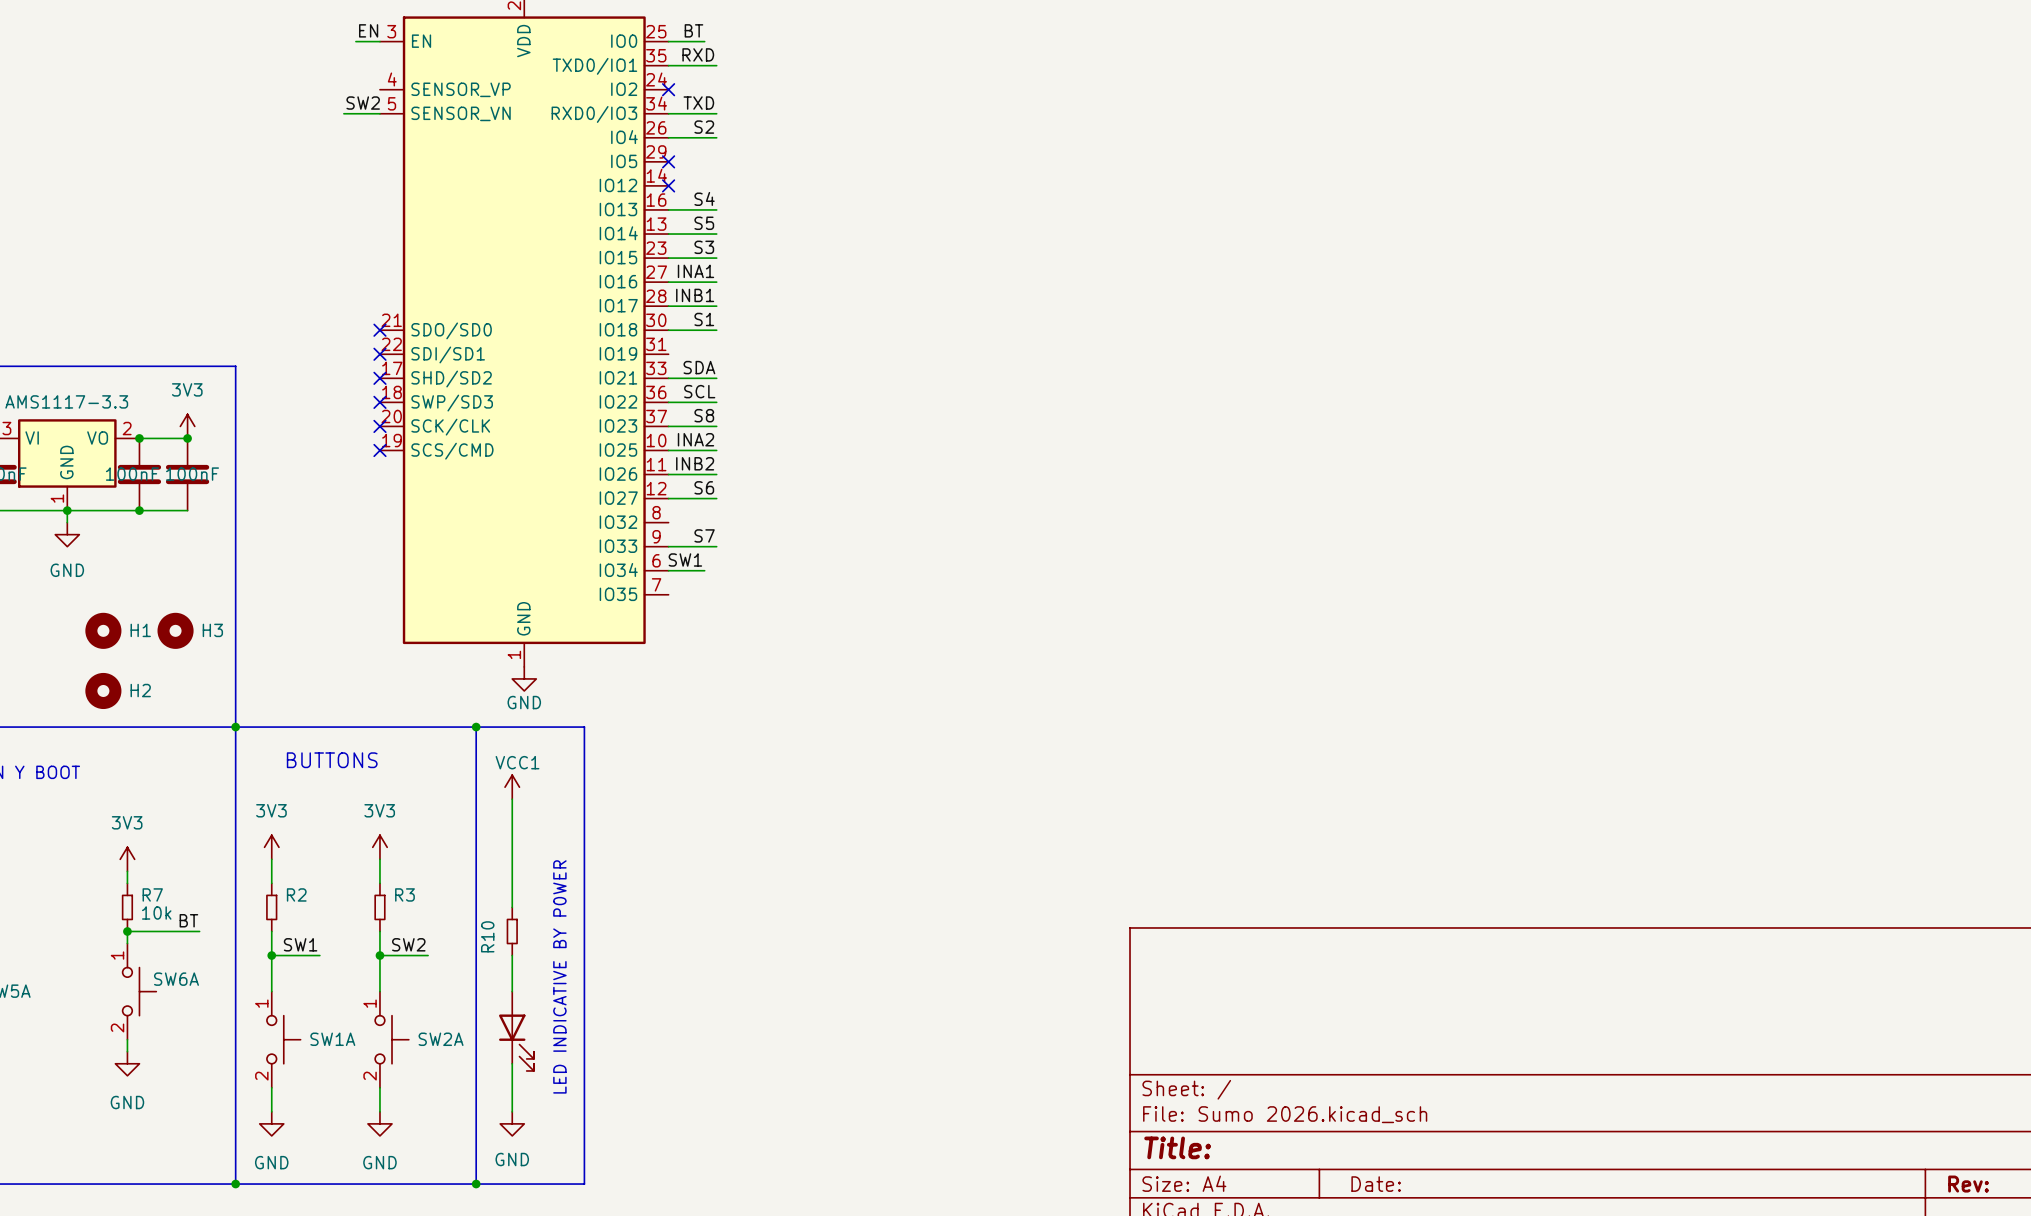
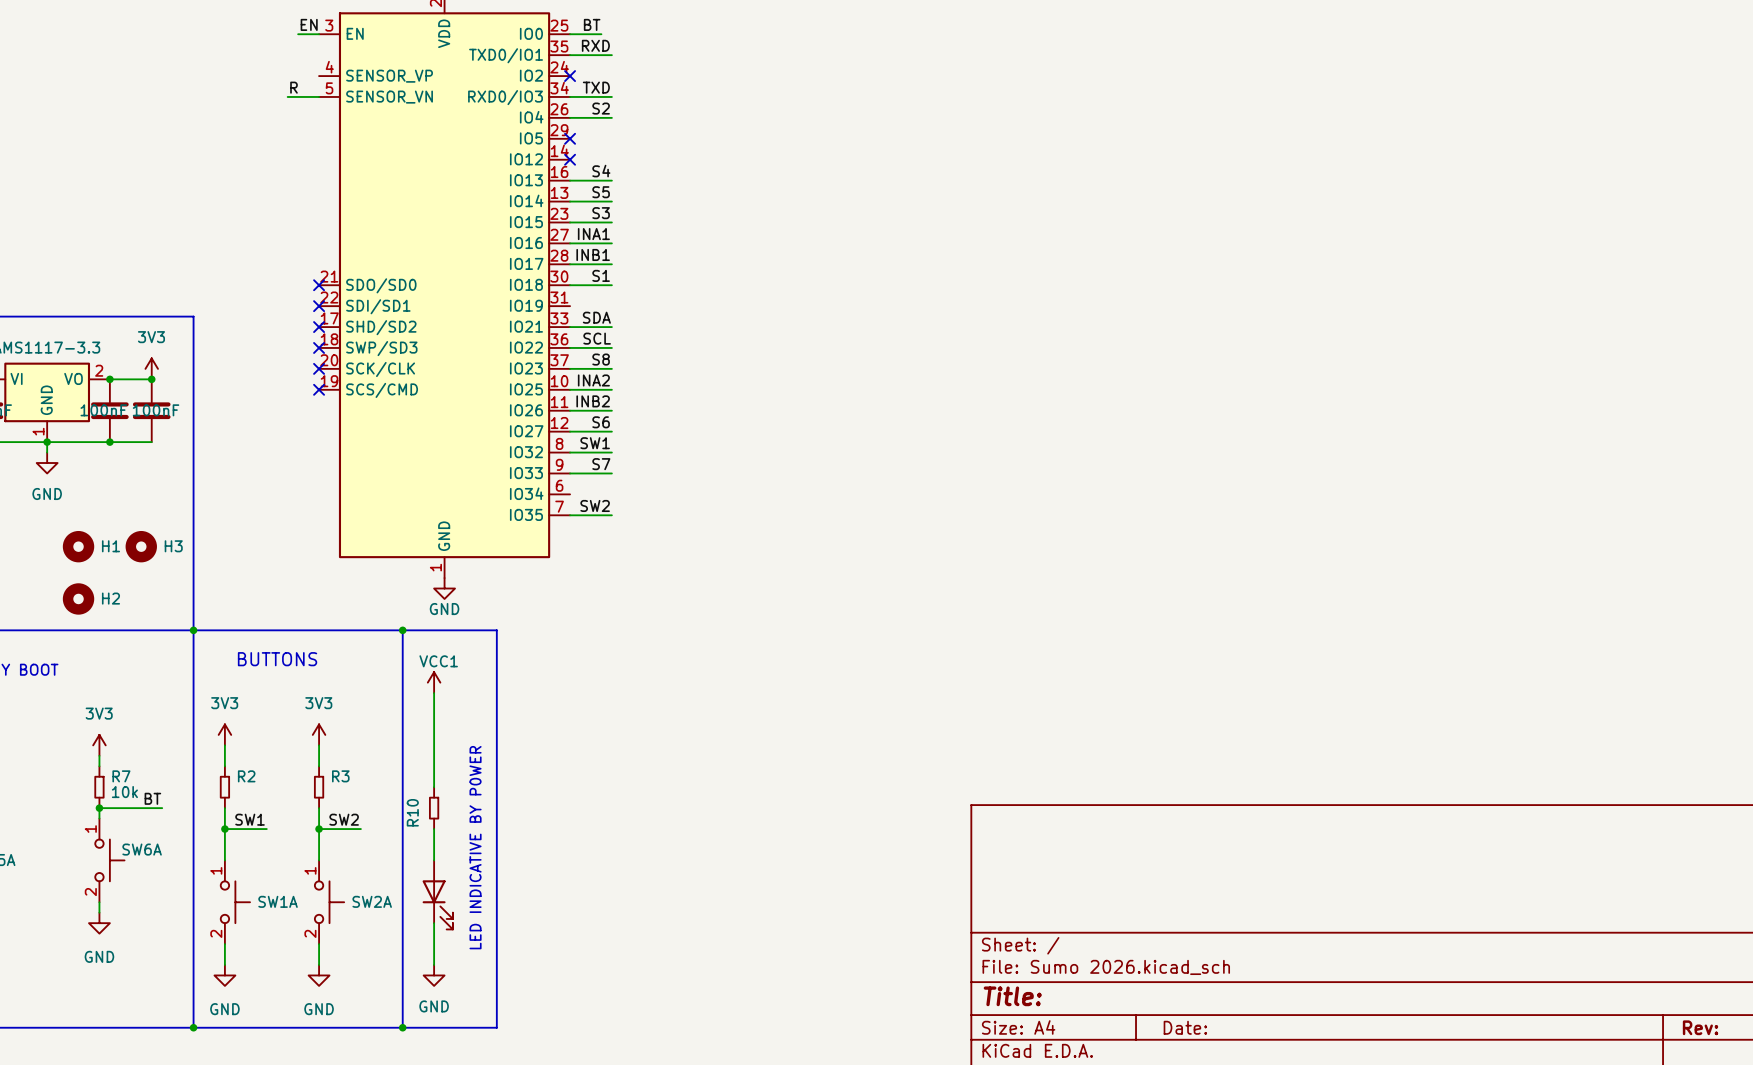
label: SW2 (363, 103) -> R (293, 87)
wire: none -> (570, 452) (611, 452)
label position: SW1 (685, 559) -> SW1 (595, 443)
wire: (668, 570) (704, 570) -> none
label: none -> SW2 (595, 505)
wire: none -> (570, 515) (611, 515)

